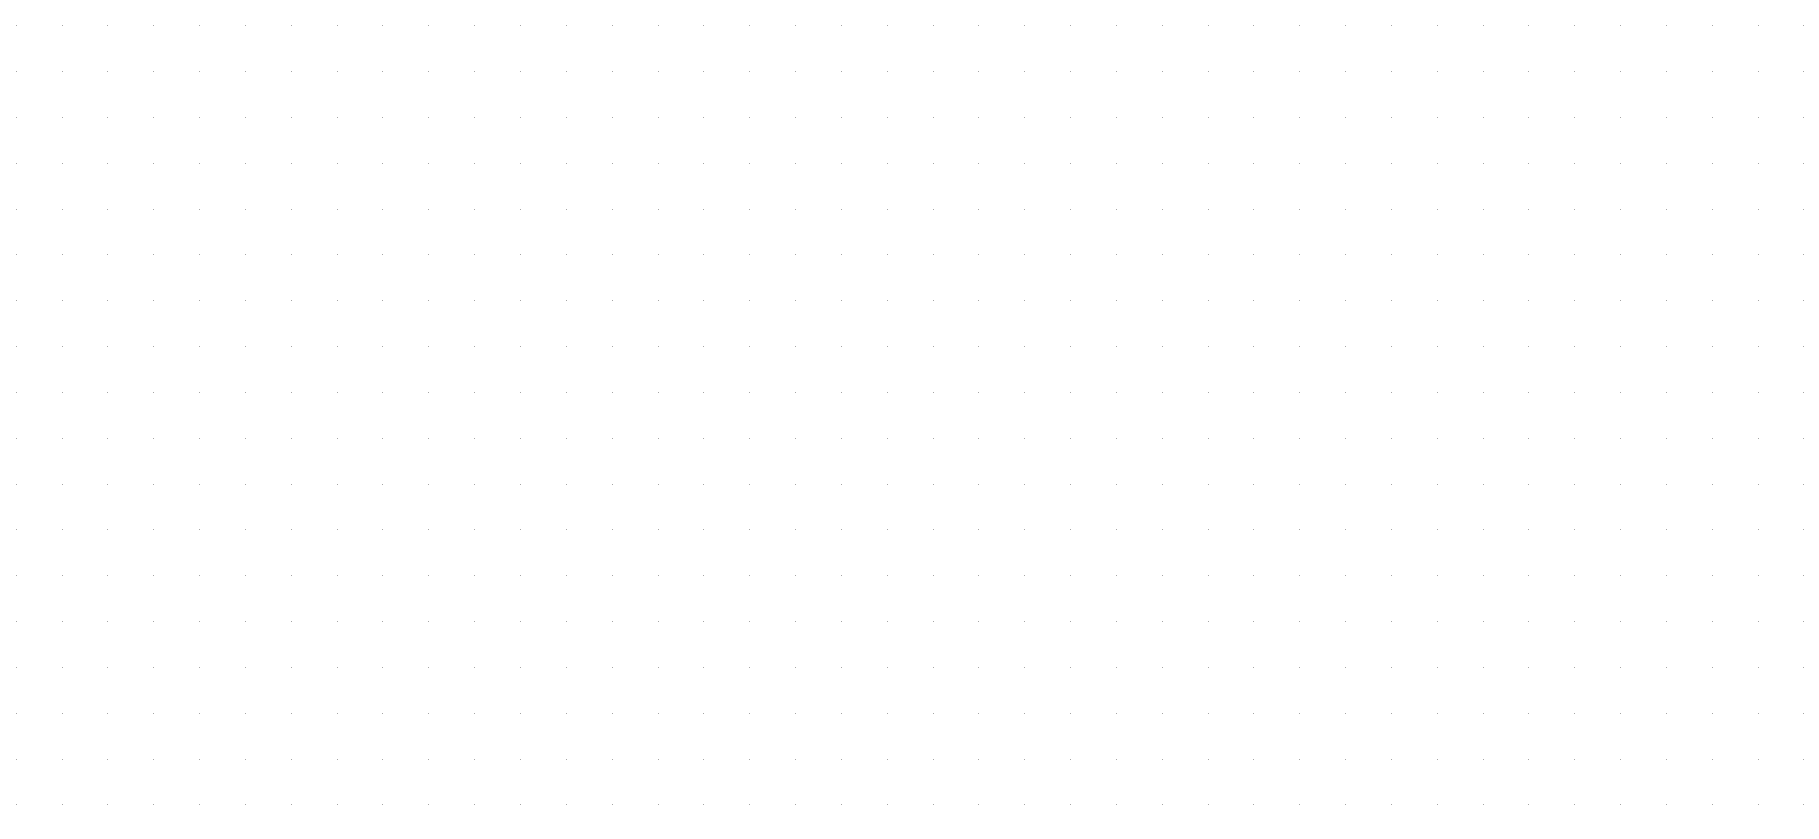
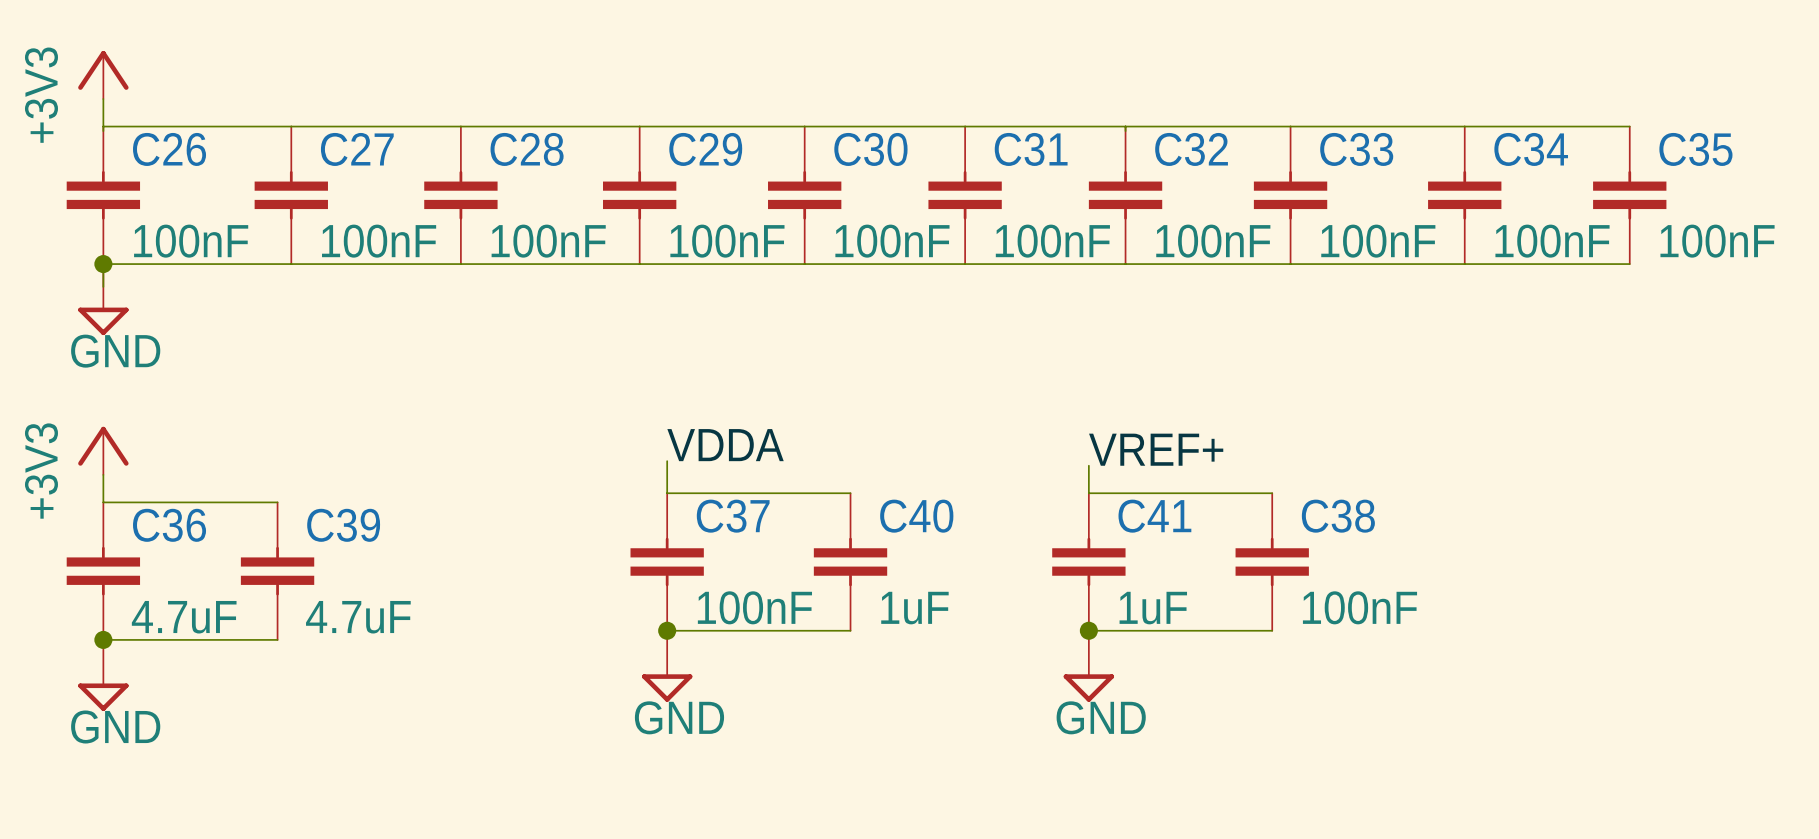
power symbol: none -> +3V3 (103, 74)
wire: none -> (103, 99) (103, 131)
wire: none -> (103, 126) (1629, 126)
wire: none -> (1125, 126) (1125, 131)
C26: none -> 100nF (103, 195)
C27: none -> 100nF (291, 195)
C28: none -> 100nF (460, 195)
C29: none -> 100nF (639, 195)
C30: none -> 100nF (804, 195)
C31: none -> 100nF (965, 195)
C32: none -> 100nF (1125, 195)
C33: none -> 100nF (1290, 195)
C34: none -> 100nF (1464, 195)
C35: none -> 100nF (1629, 195)
junction: none -> (103, 264)
wire: none -> (1629, 264) (103, 264) (103, 286)
power symbol: none -> GND (103, 299)
label: none -> VDDA (725, 445)
label: none -> VREF+ (1156, 449)
power symbol: none -> +3V3 (103, 450)
wire: none -> (667, 461) (667, 493) (850, 493)
wire: none -> (1088, 465) (1088, 493) (1272, 493)
wire: none -> (103, 474) (103, 502) (277, 502)
C37: none -> 100nF (667, 562)
C40: none -> 1uF (850, 562)
C41: none -> 1uF (1088, 562)
C38: none -> 100nF (1272, 562)
C36: none -> 4.7uF (103, 571)
C39: none -> 4.7uF (277, 571)
wire: none -> (667, 630) (850, 630)
junction: none -> (667, 630)
wire: none -> (1088, 630) (1272, 630)
junction: none -> (1088, 630)
wire: none -> (103, 639) (277, 639)
junction: none -> (103, 639)
power symbol: none -> GND (667, 666)
power symbol: none -> GND (1088, 666)
power symbol: none -> GND (103, 675)

